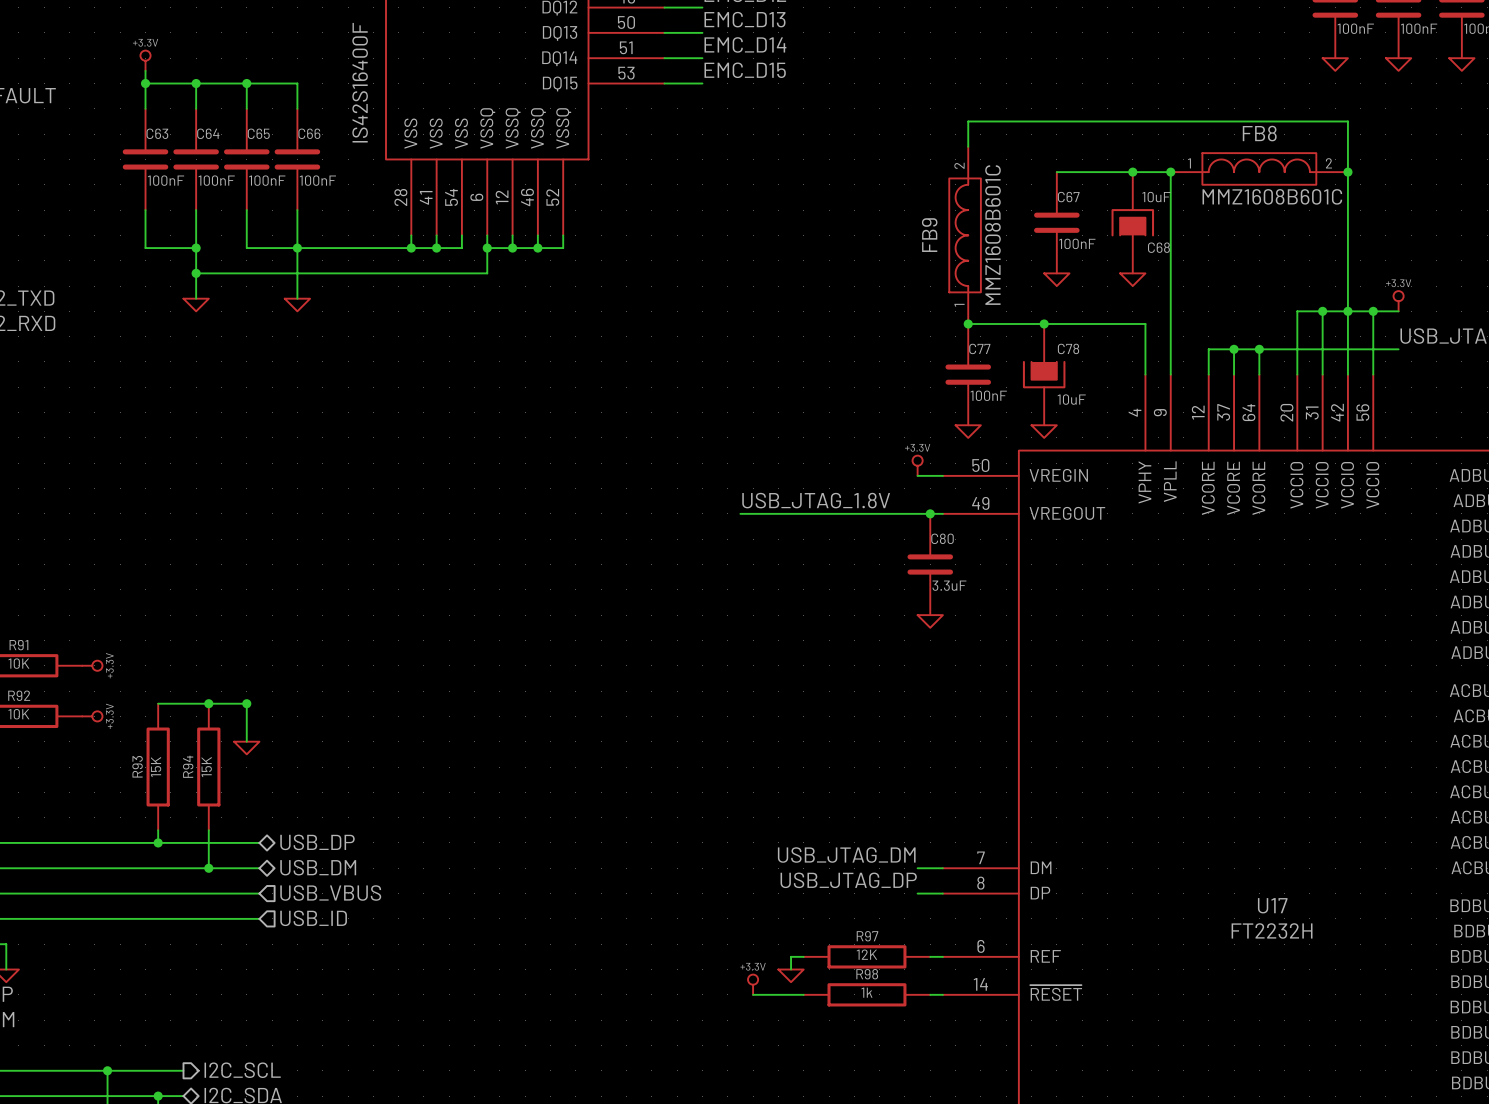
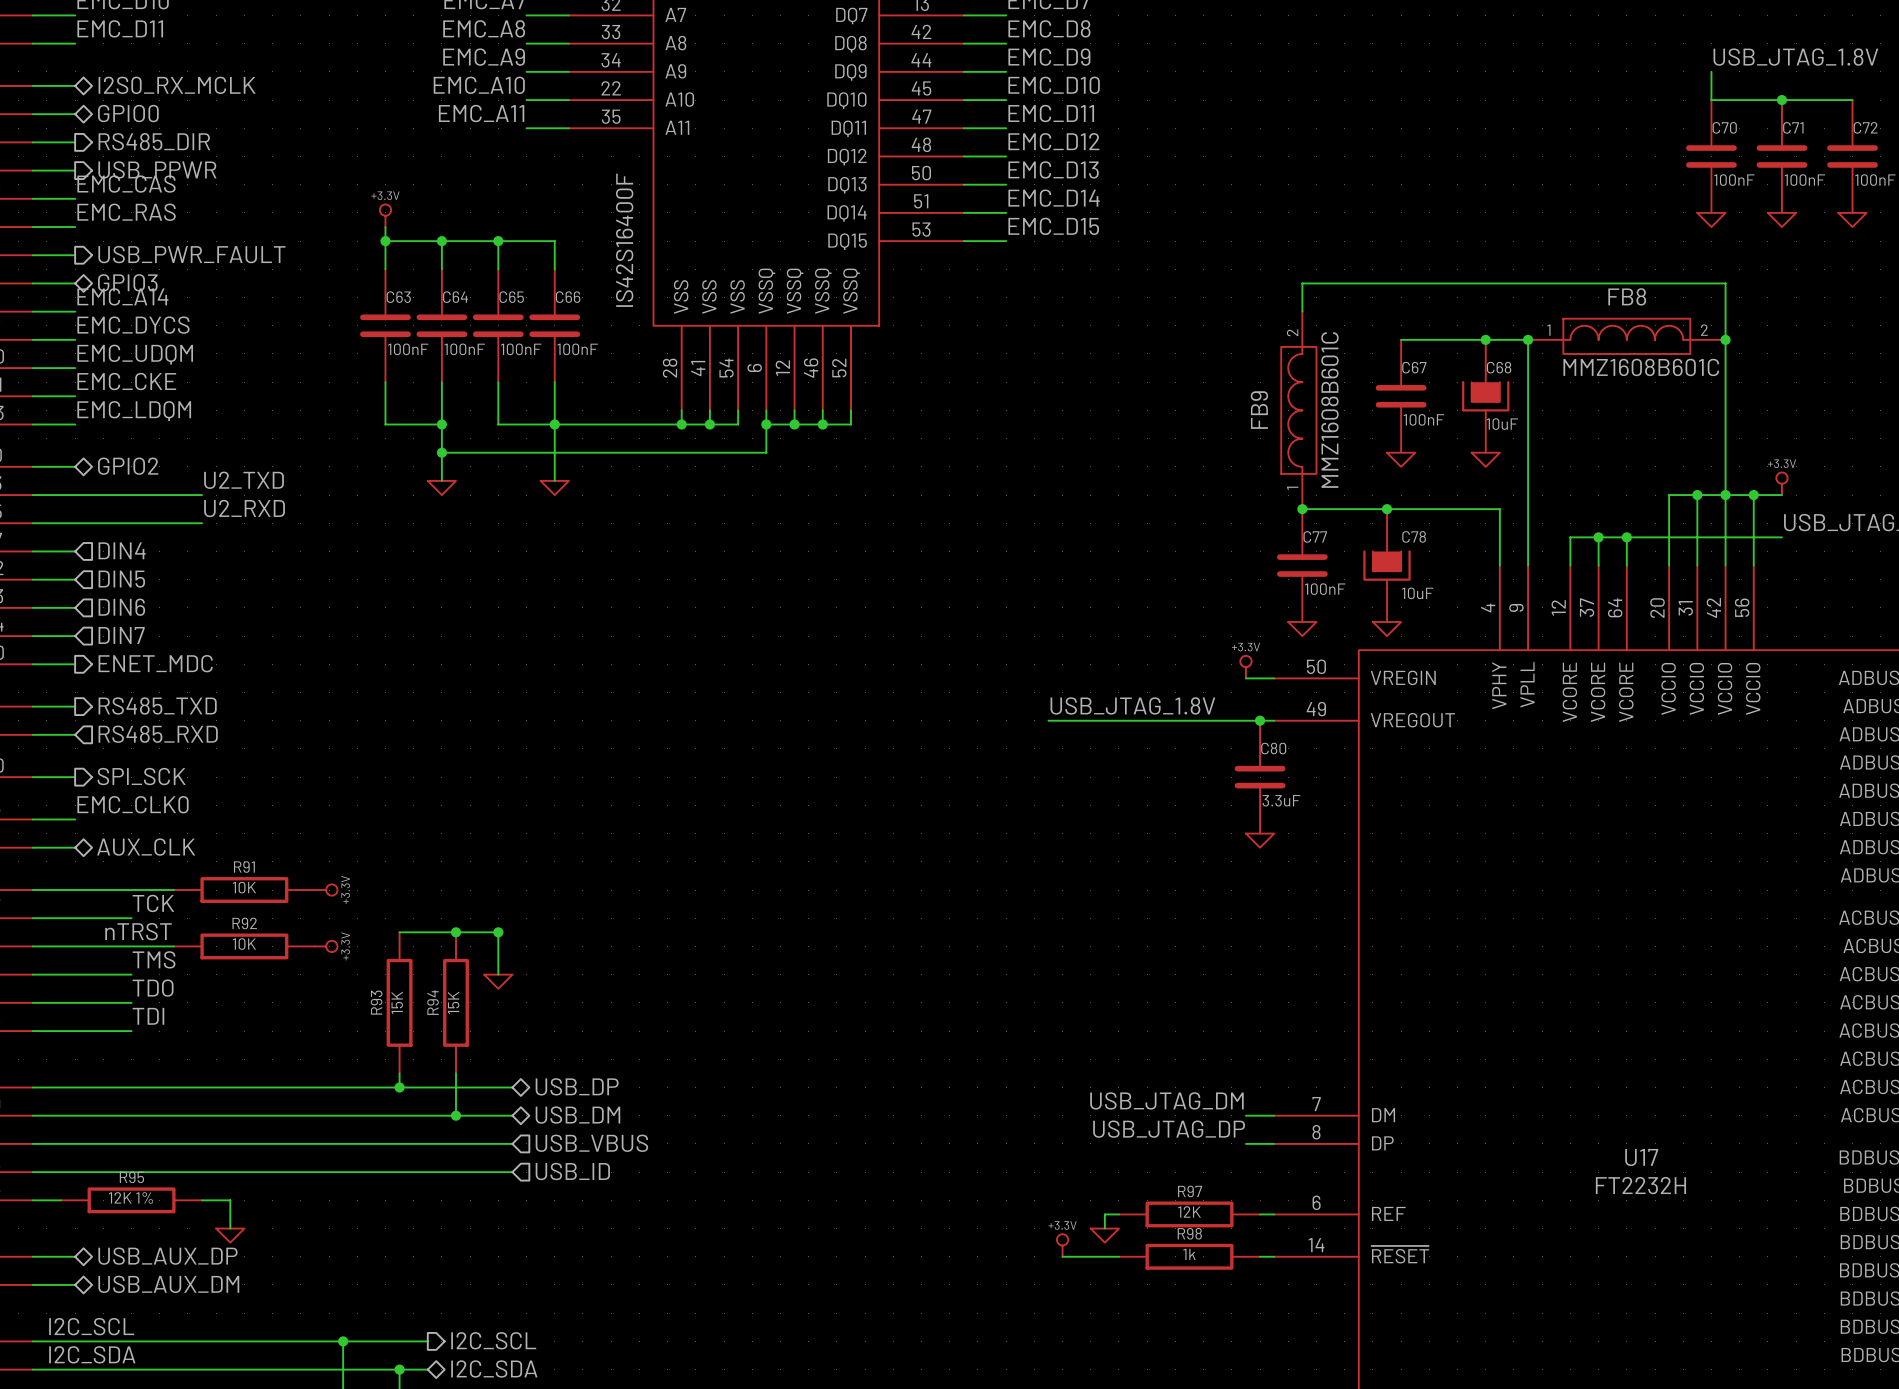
C68 value position: 10uF (1156, 197) -> 10uF (1502, 424)
C68 rotation: 0° (1132, 222) -> 180° (1485, 396)
C68 name position: C68 (1158, 247) -> C68 (1499, 367)

